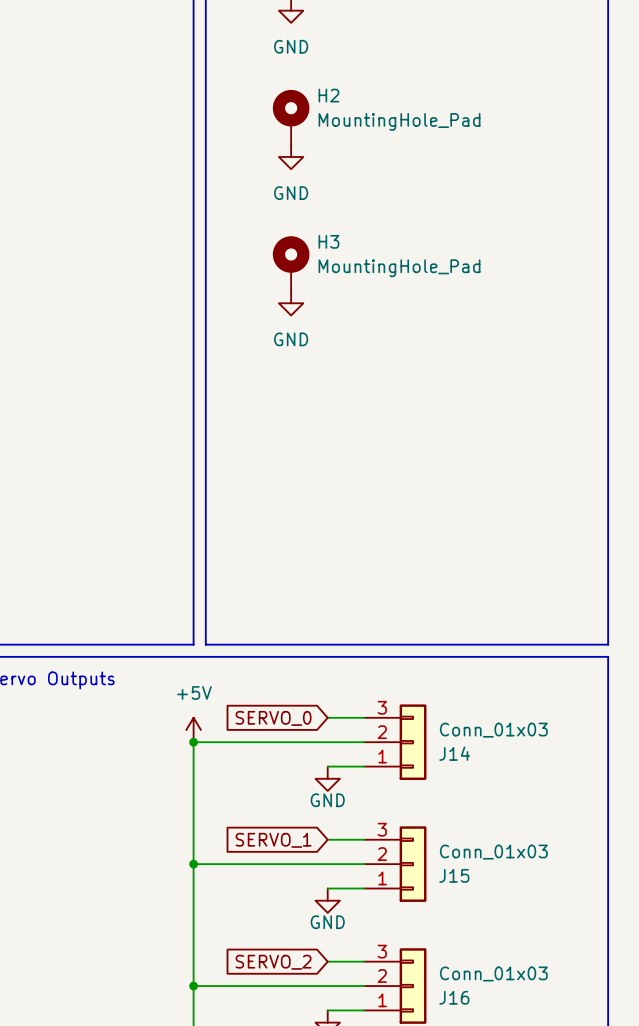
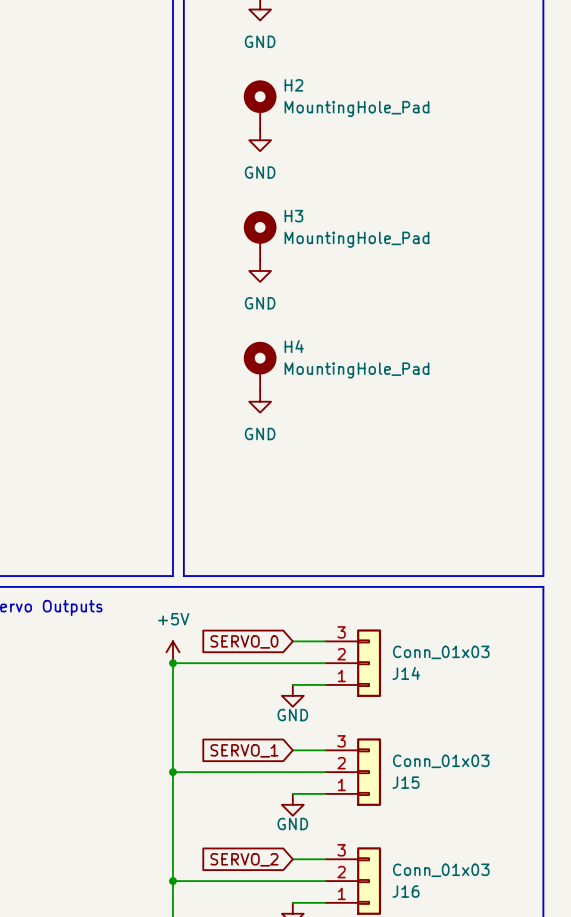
H4: none -> MountingHole_Pad (260, 366)
power symbol: none -> GND (260, 401)

